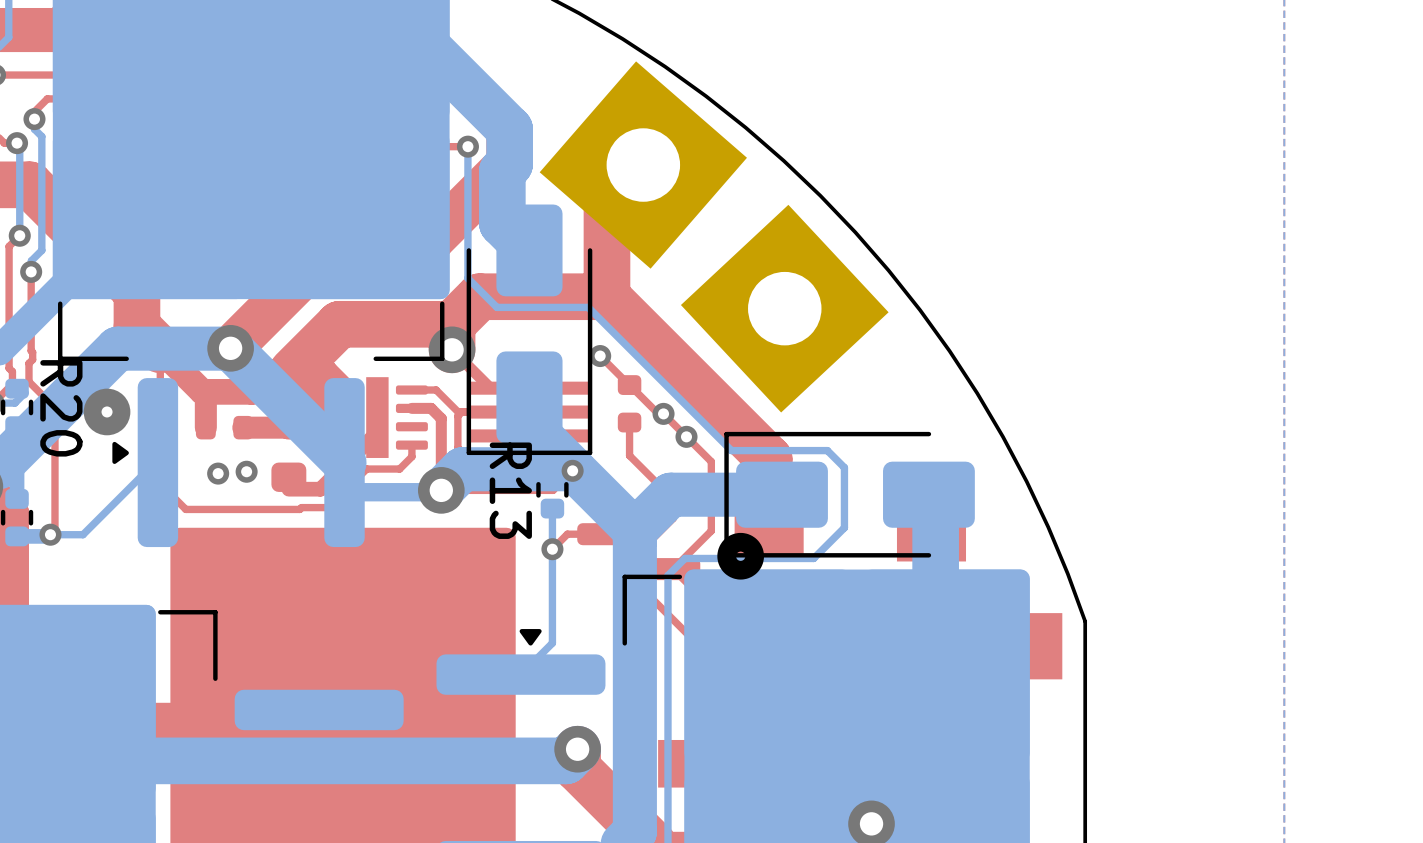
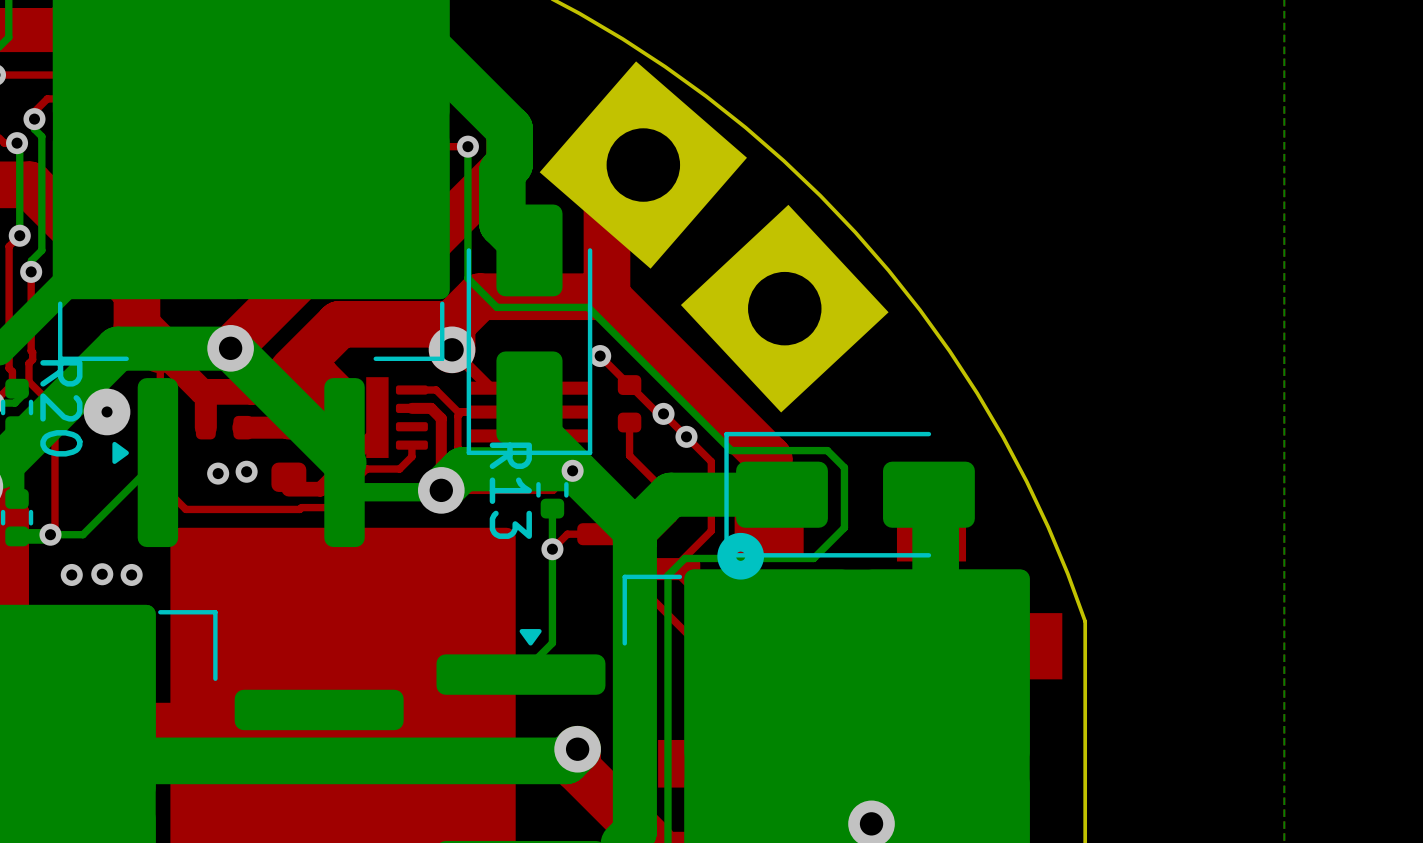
via: none -> (71, 574)
via: none -> (102, 574)
via: none -> (131, 574)

